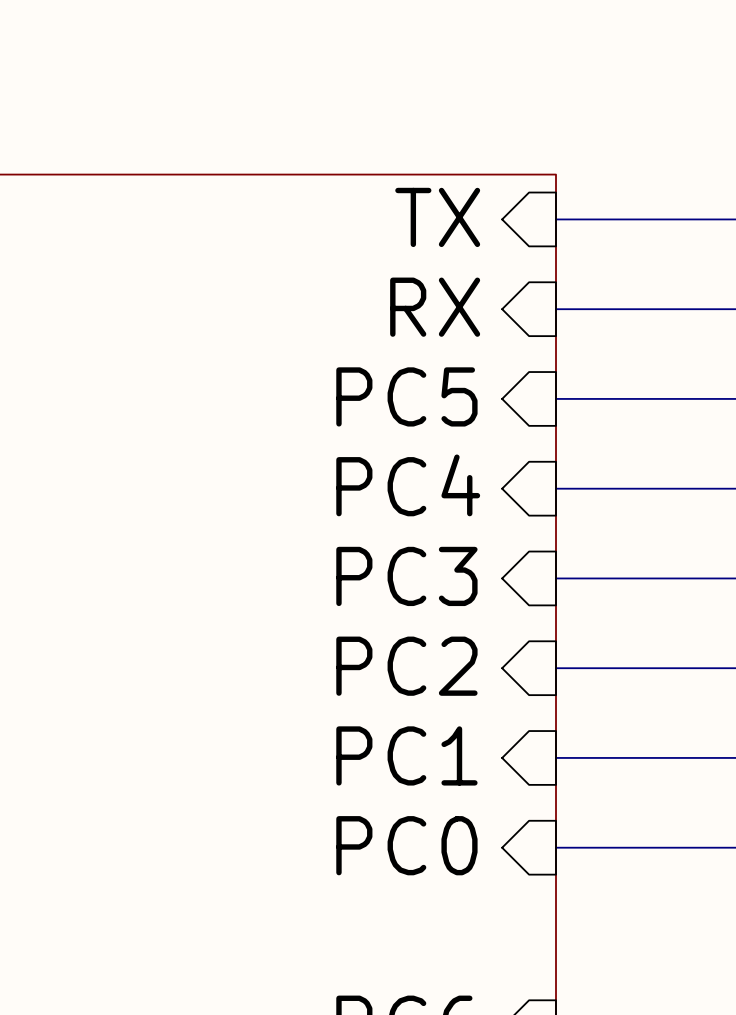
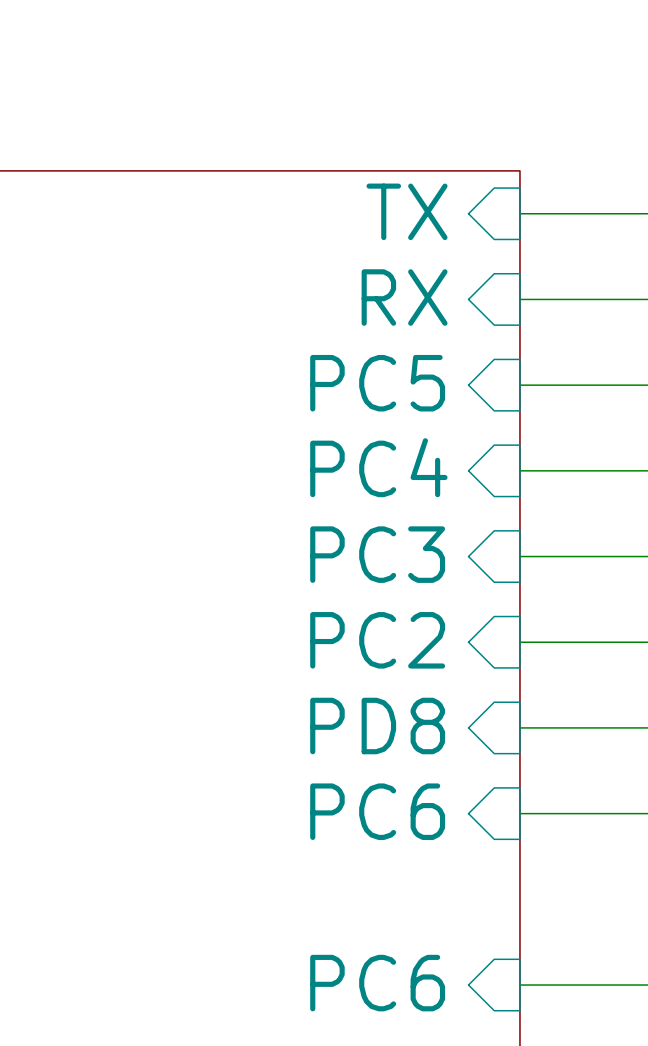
sheet pin: PC1 (406, 755) -> PD8 (377, 726)
sheet pin: PC0 (406, 845) -> PC6 (377, 811)

